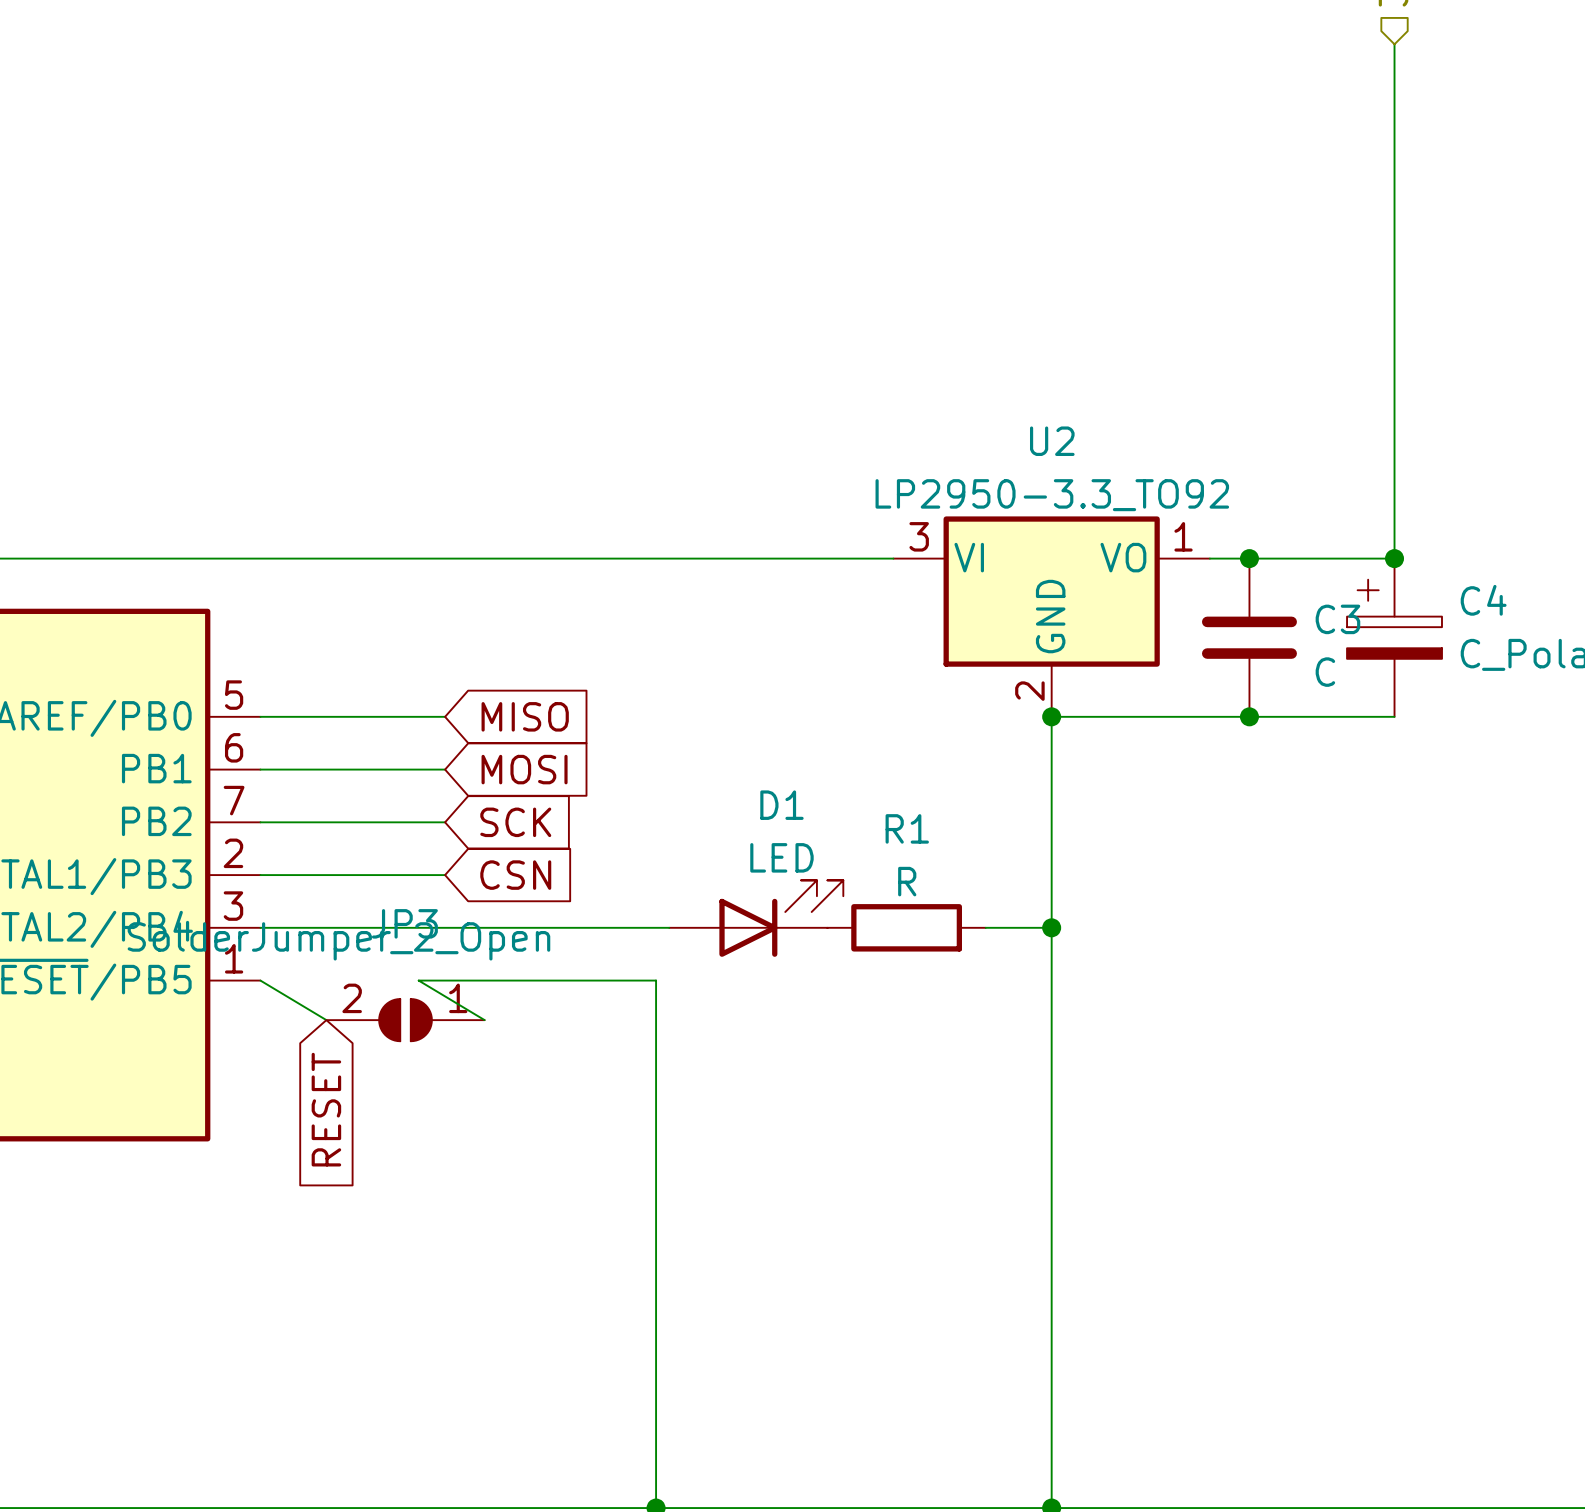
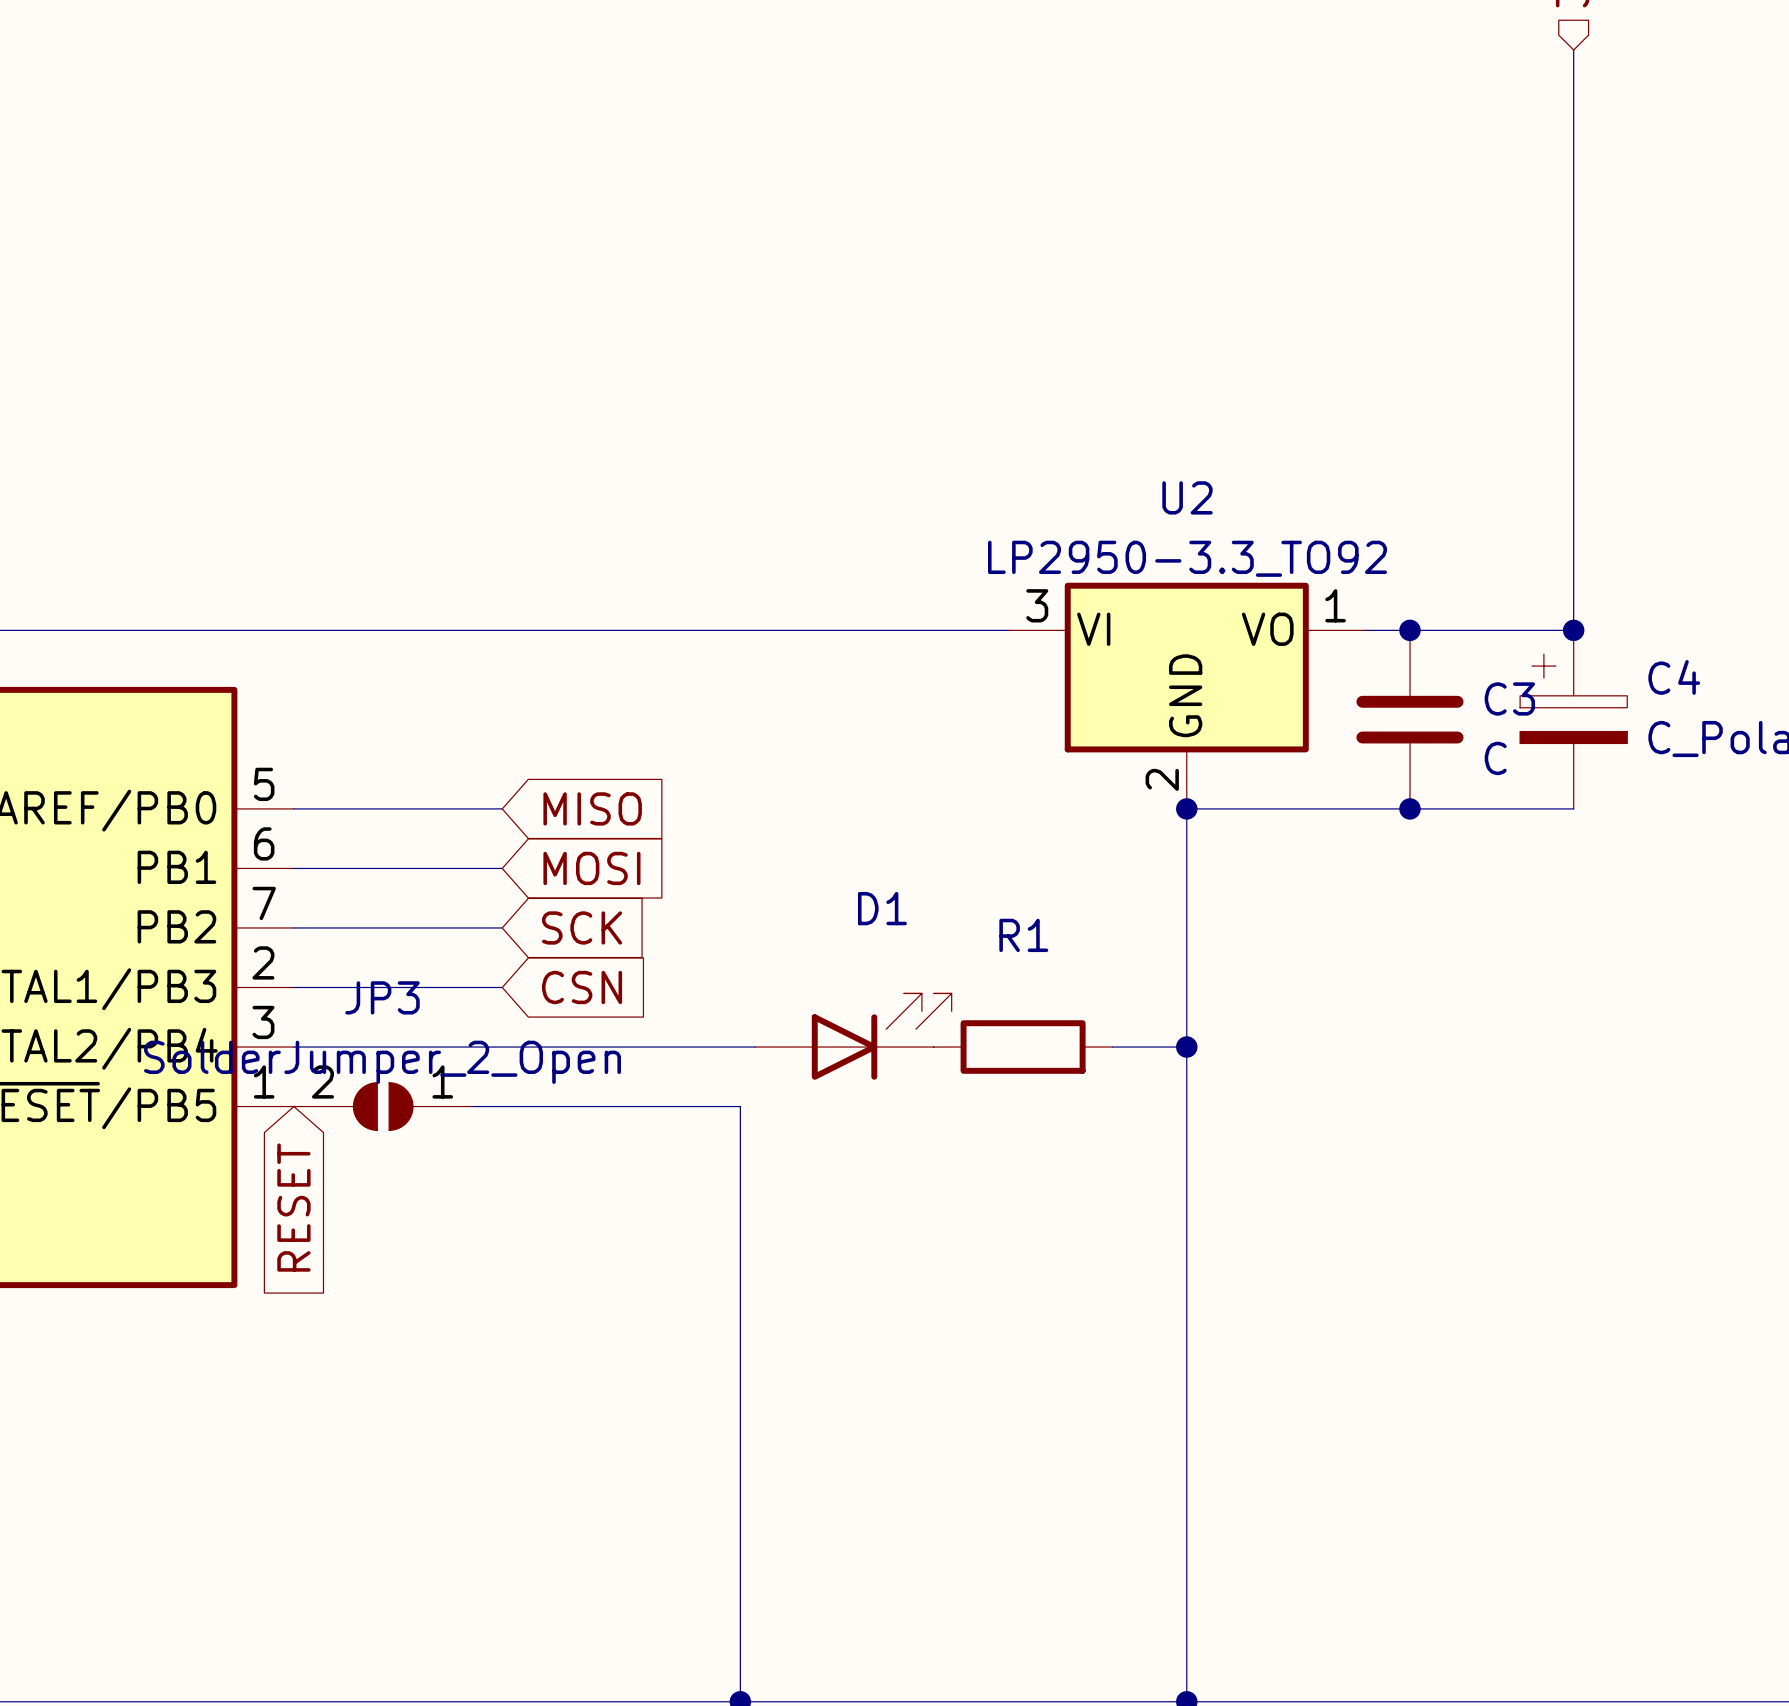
D1 value: LED (781, 857) -> none
R1 value: R (907, 881) -> none
wire: (260, 980) (326, 1020) -> none
wire: (418, 980) (484, 1020) -> none
JP3 position: (405, 1020) -> (383, 1106)
global label position: RESET (326, 1109) -> RESET (293, 1207)

